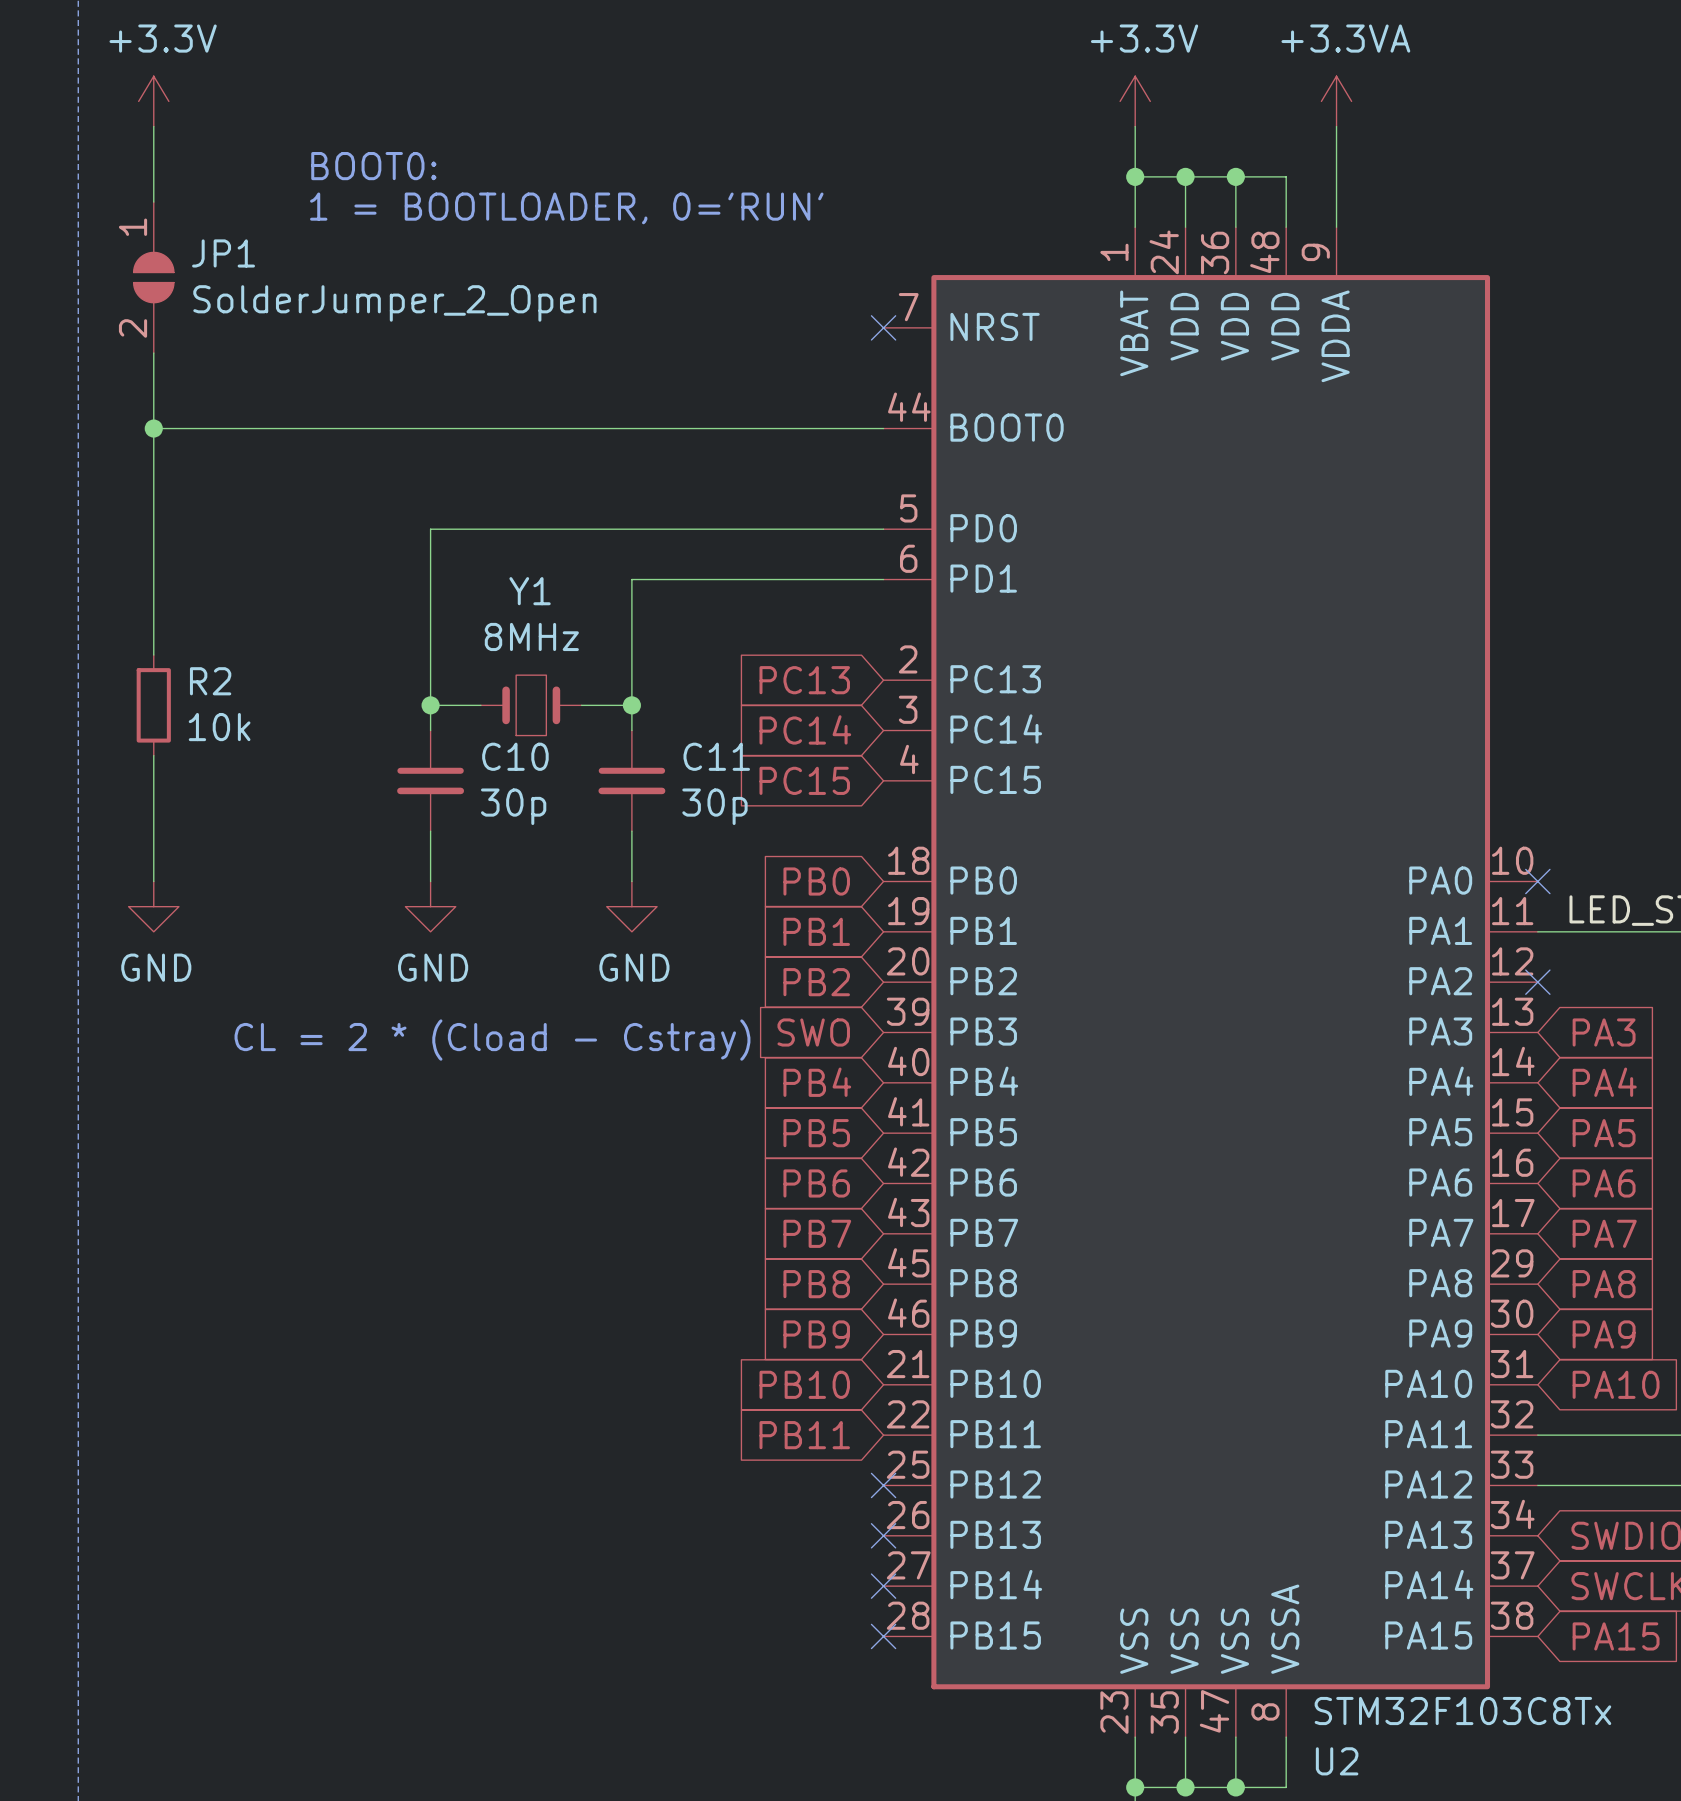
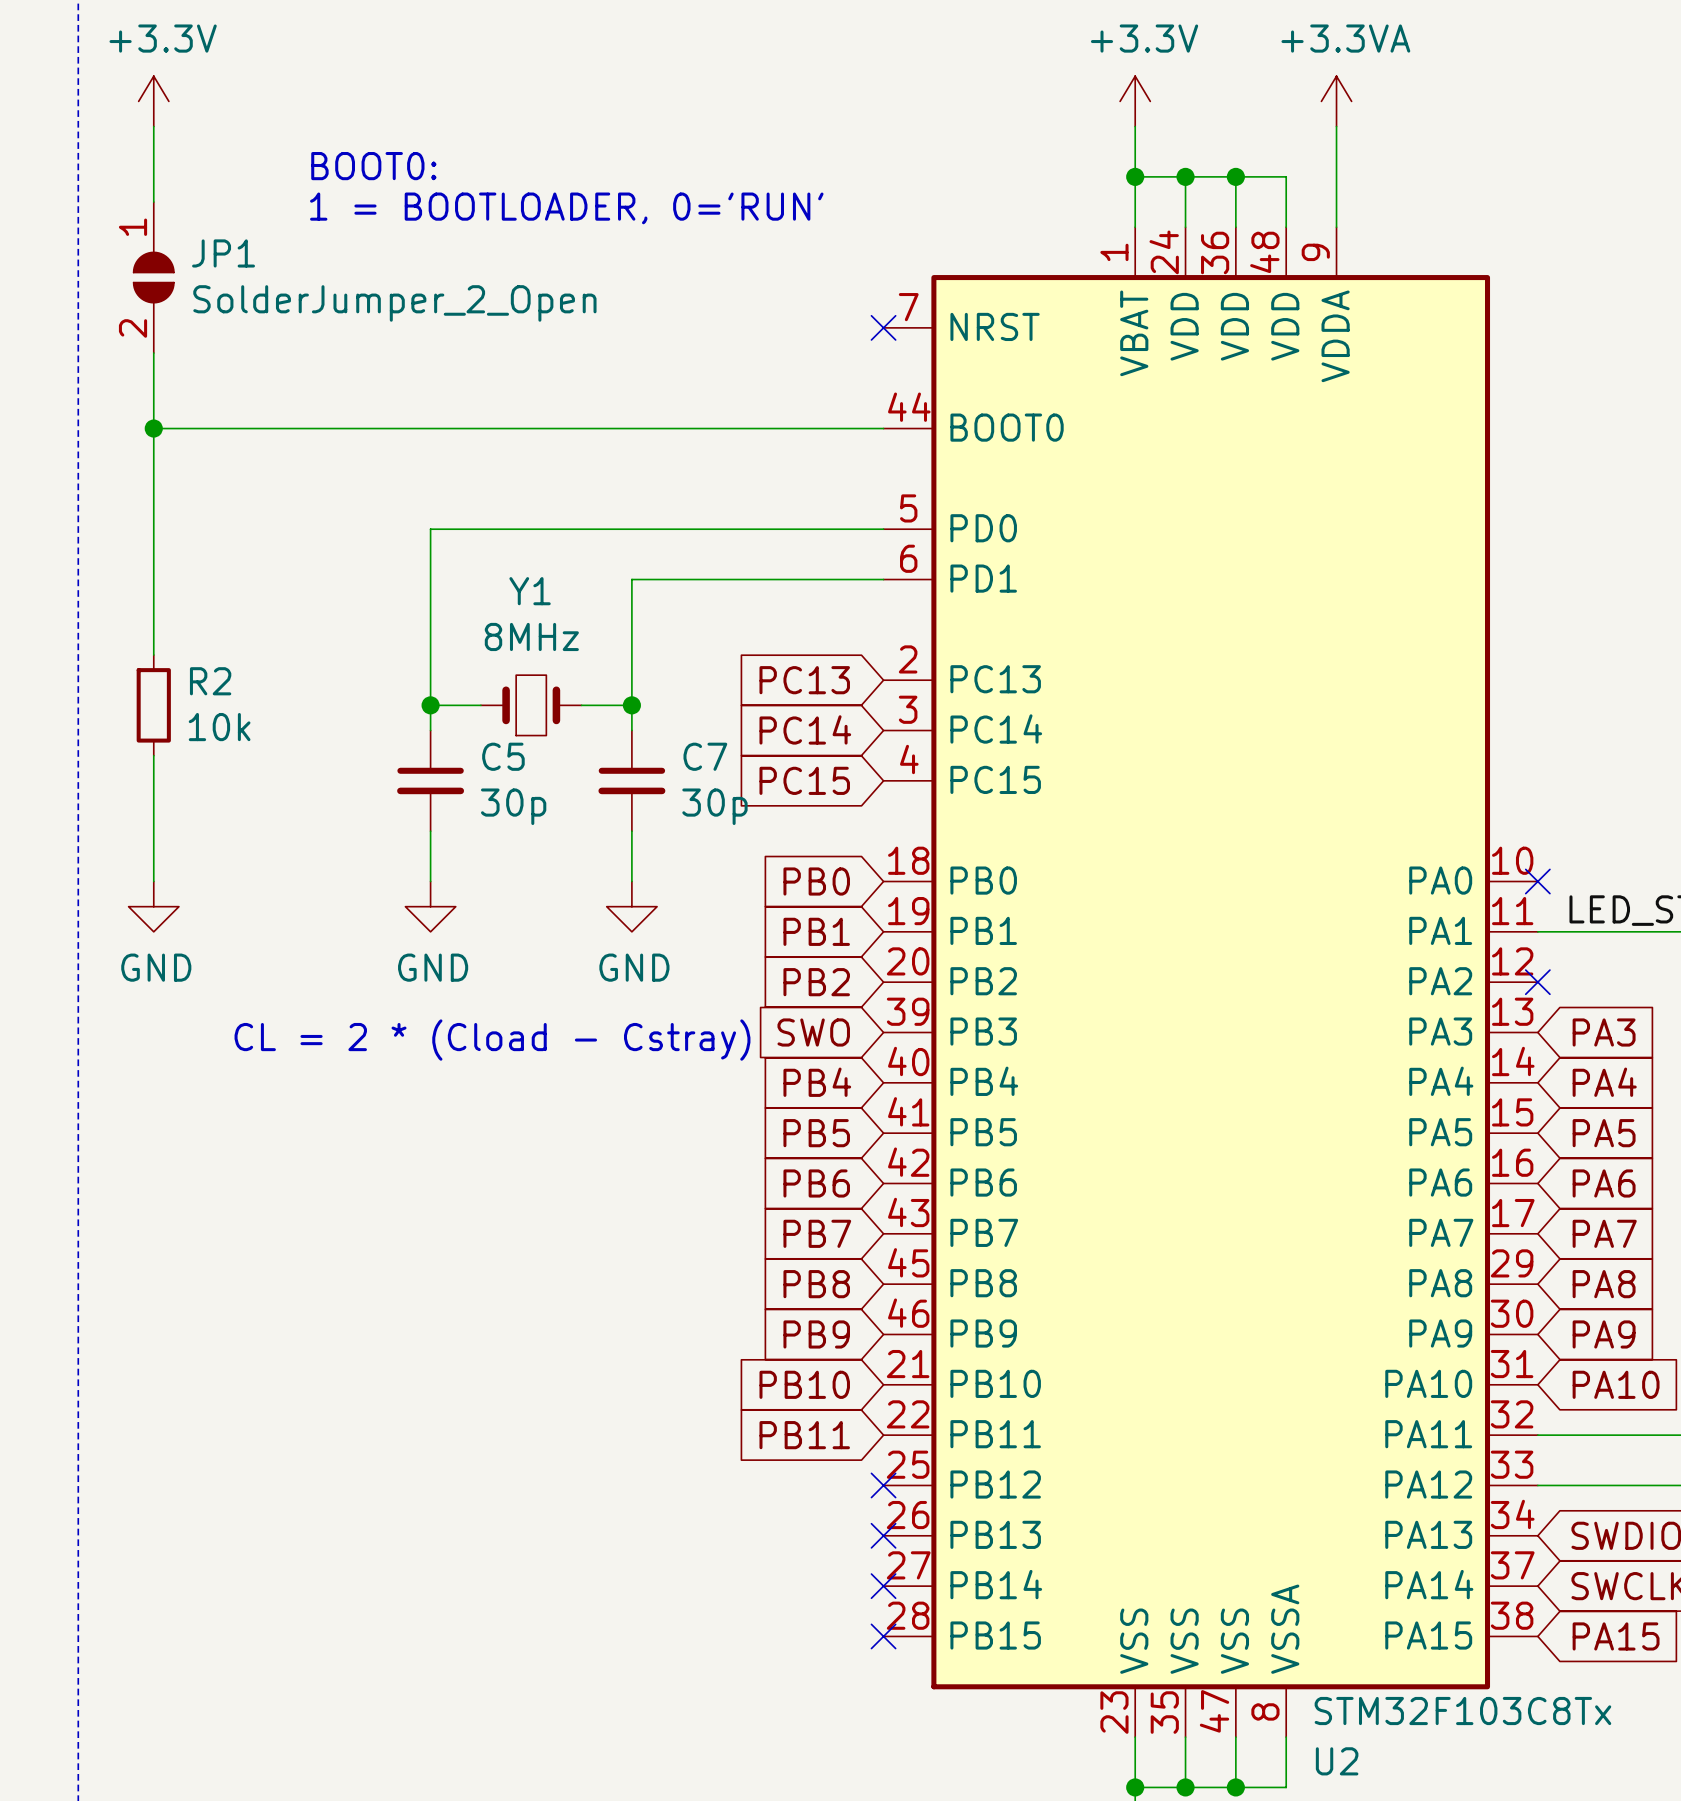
C10 name: C10 (515, 756) -> C5 (503, 756)
C11 name: C11 (716, 756) -> C7 (705, 756)

